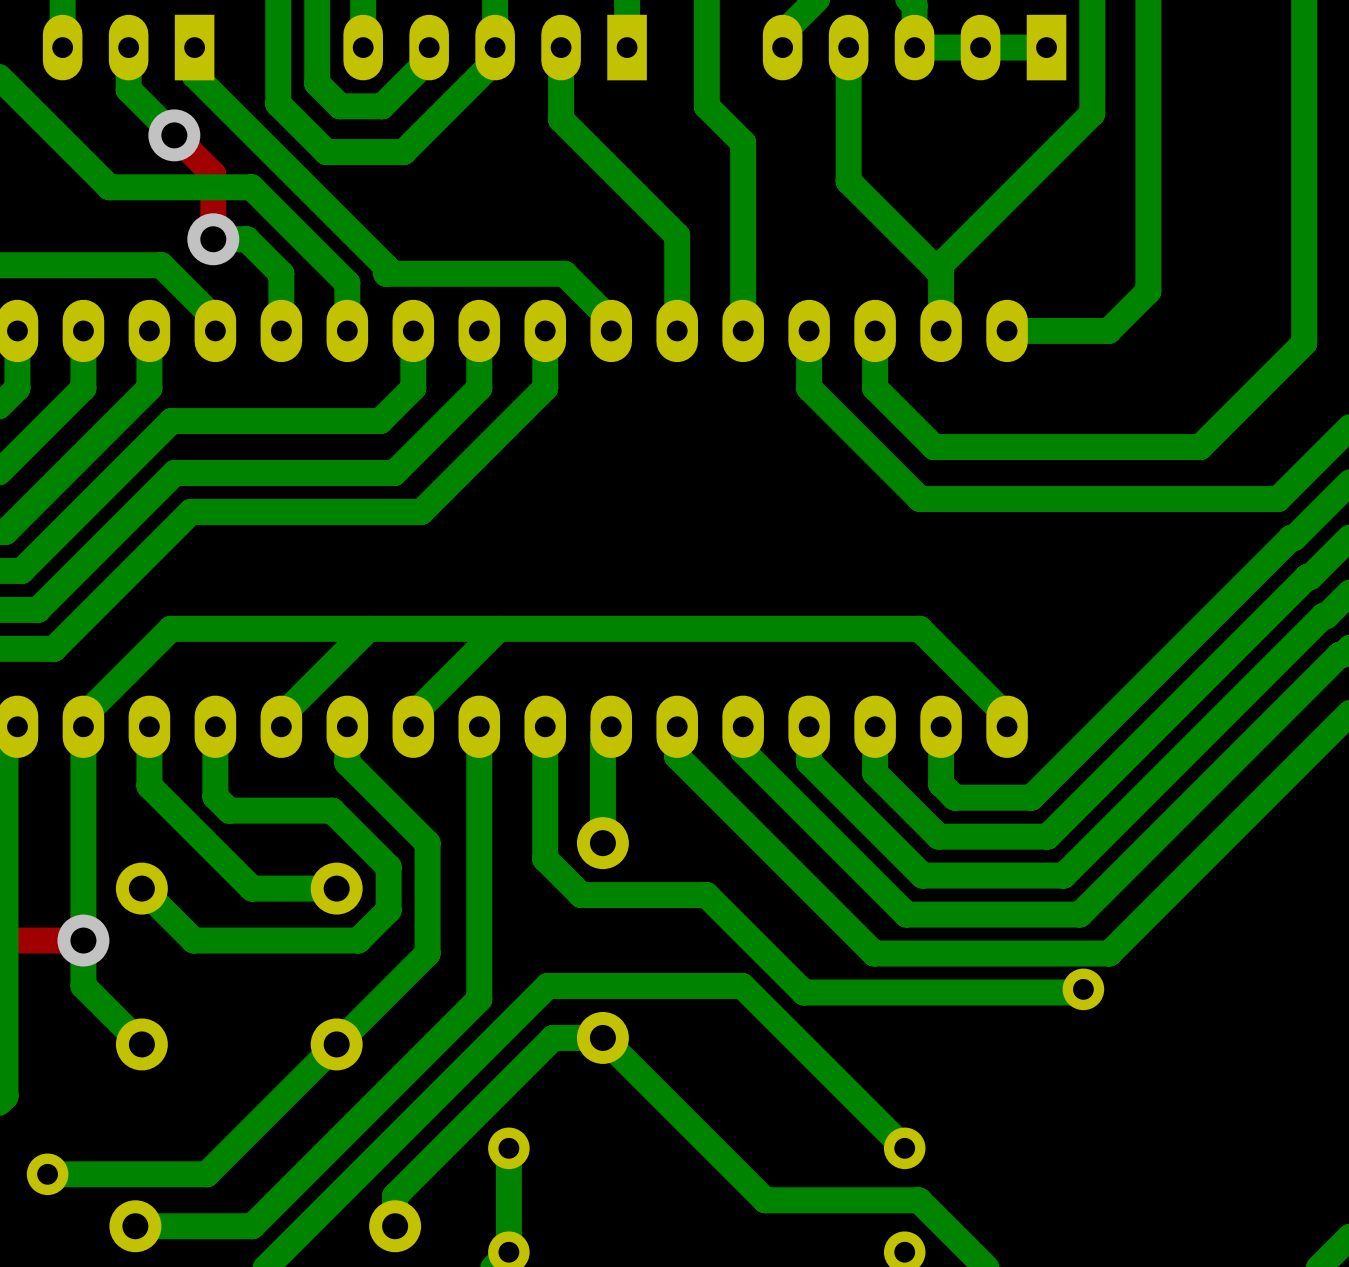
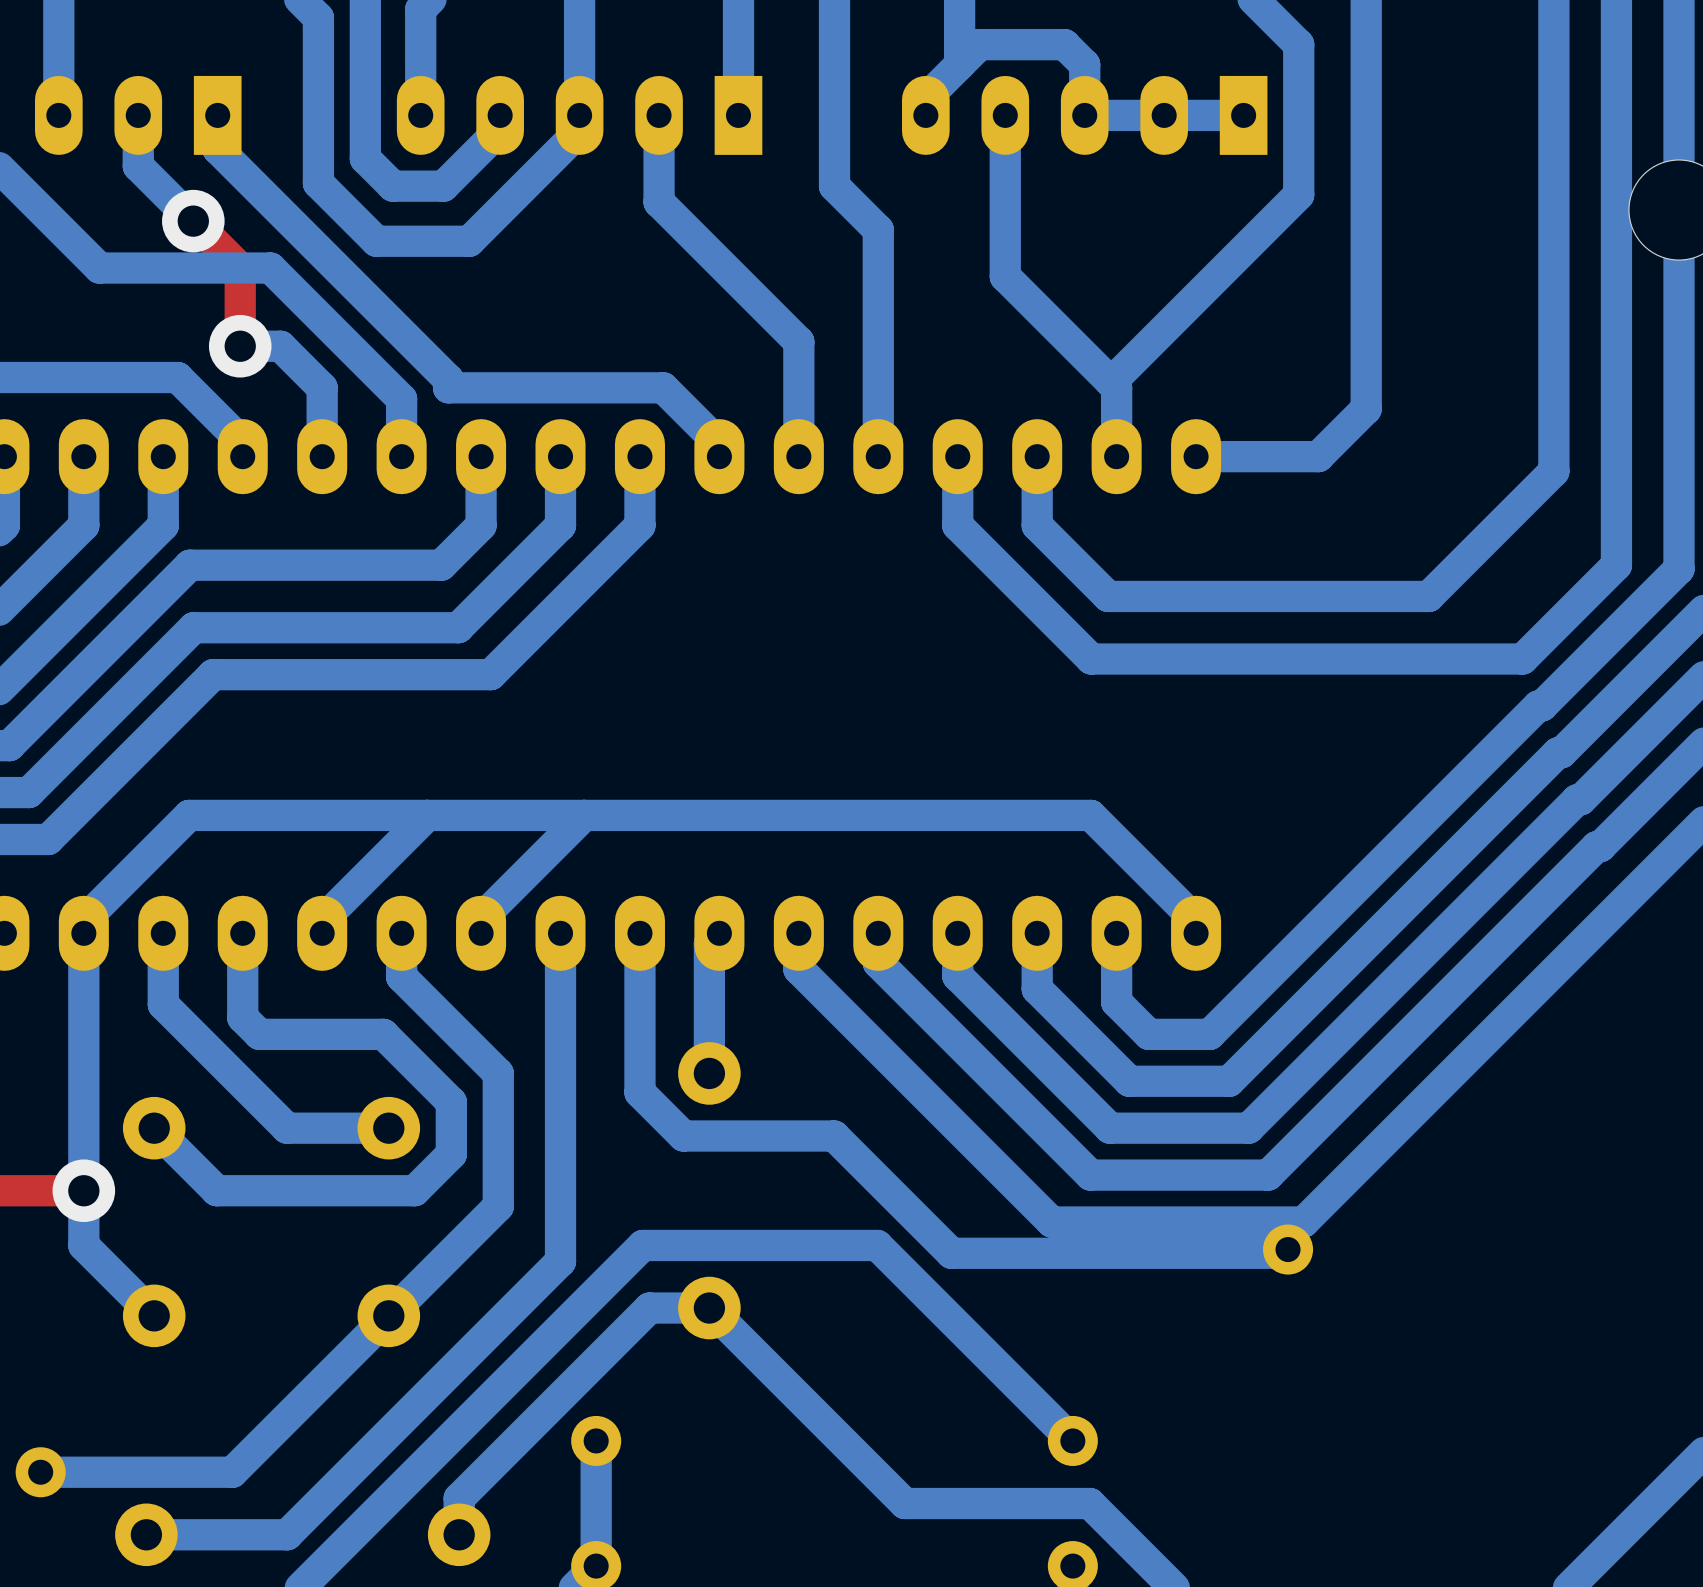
bottom track: (96, 174) (109, 187) (251, 187) -> (99, 268) (270, 268) (286, 283)
bottom track: (1031, 797) (954, 797) -> (1225, 1018) (1209, 1034) (1148, 1034) (1133, 1018)
bottom track: (1047, 836) (938, 836) -> (1244, 1065) (1229, 1081) (1129, 1081) (1113, 1065)
bottom track: (1063, 875) (922, 875) -> (1264, 1112) (1248, 1128) (1109, 1128) (1094, 1112)
bottom track: (1079, 914) (906, 914) -> (1283, 1159) (1268, 1175) (1090, 1175) (1074, 1159)
bottom track: (1109, 953) (874, 953) -> (1319, 1206) (1303, 1222) (1051, 1222) (1036, 1206)

